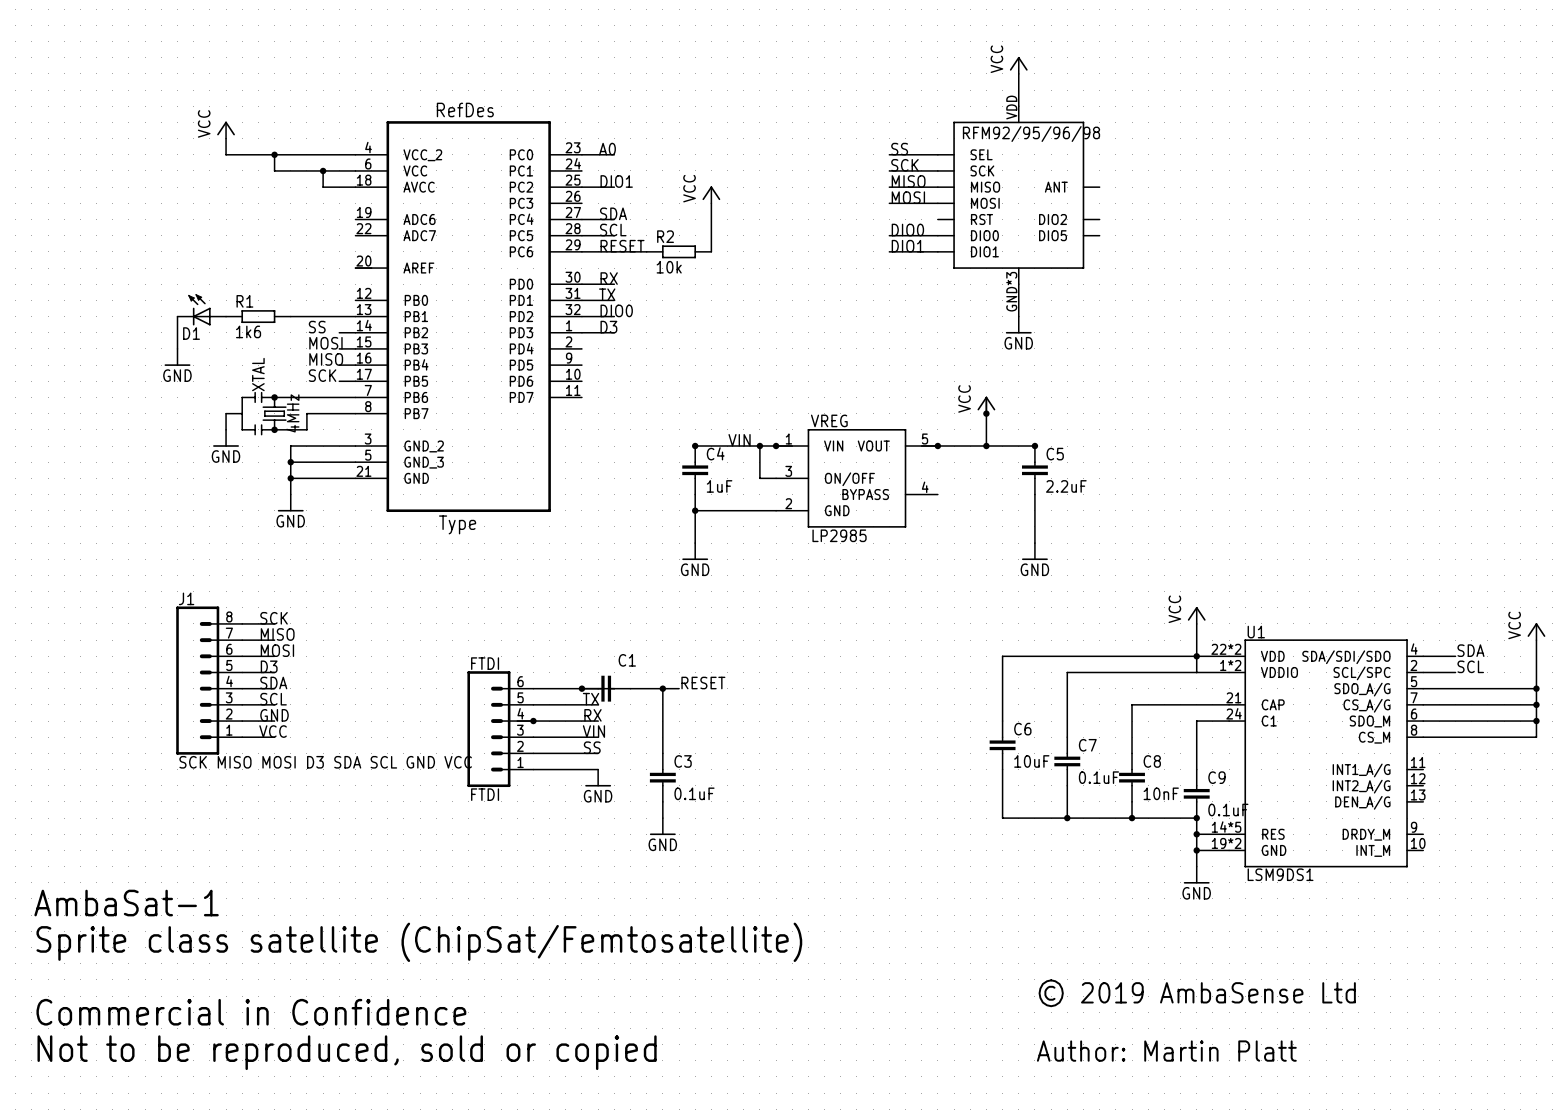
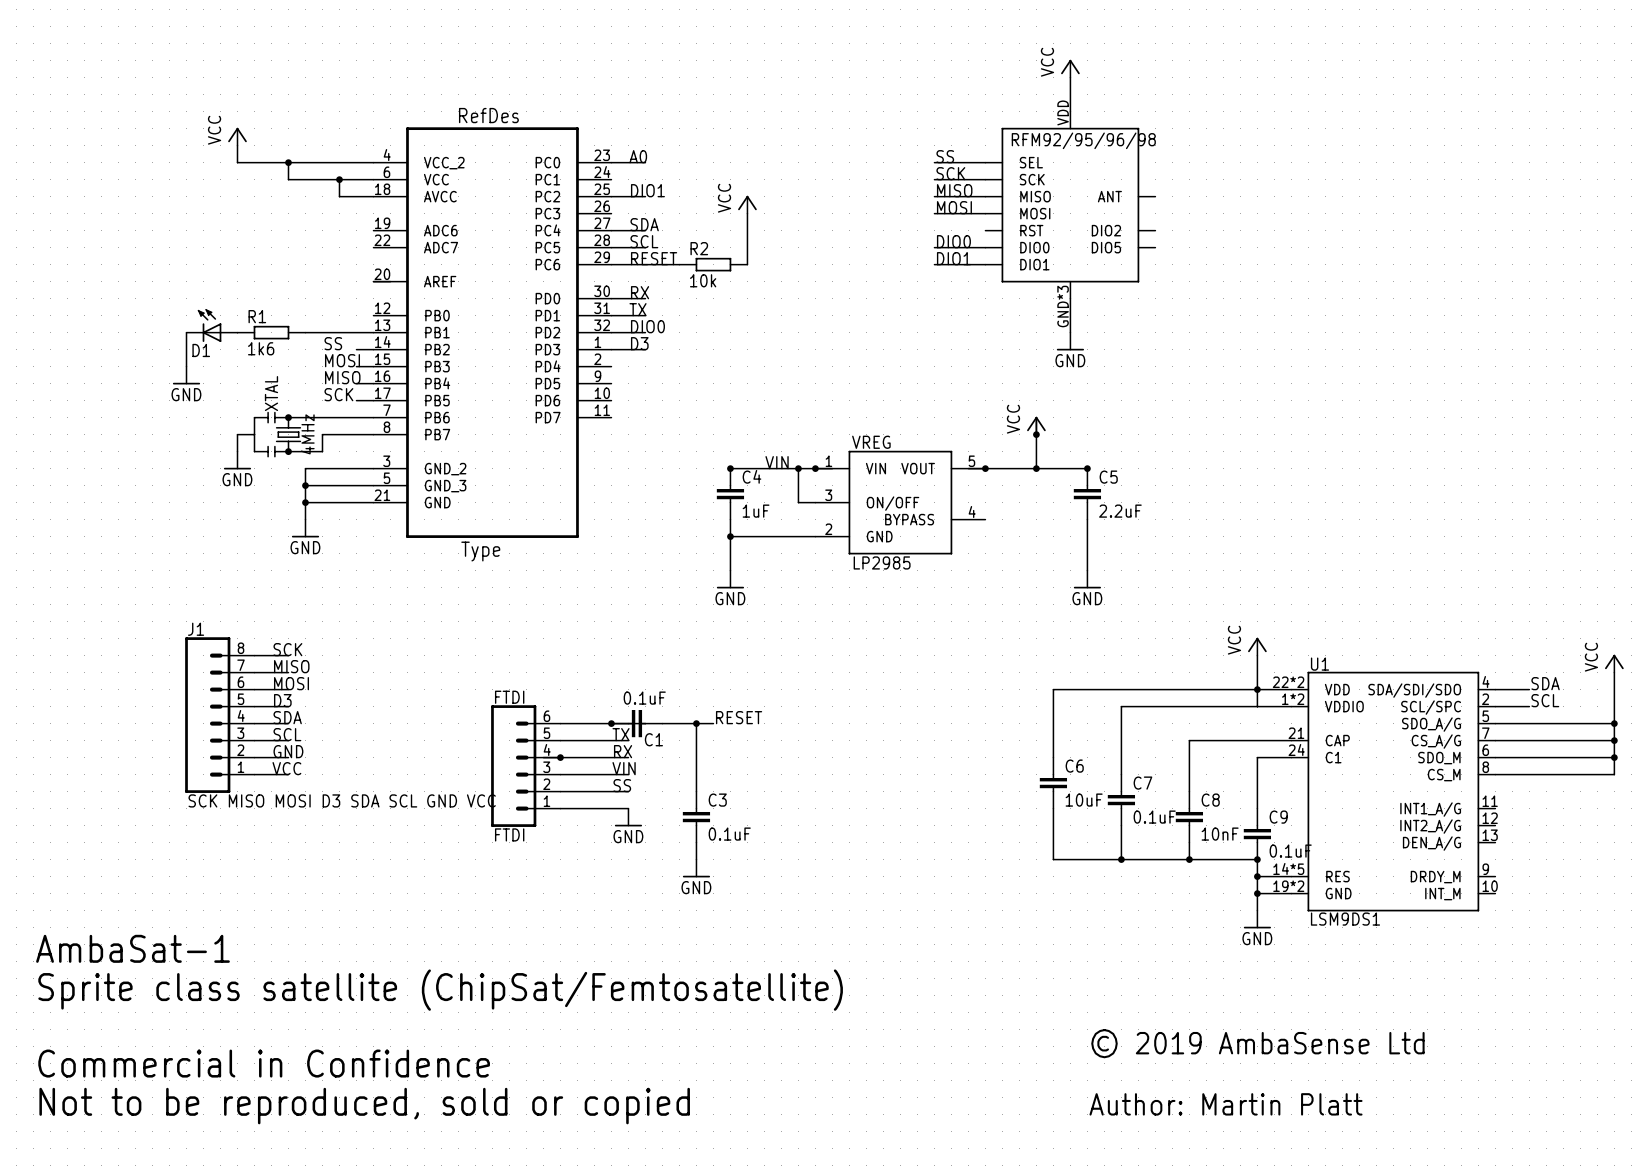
C1 name position: C1 (627, 660) -> C1 (653, 739)
C1 value: none -> 0.1uF (644, 698)

